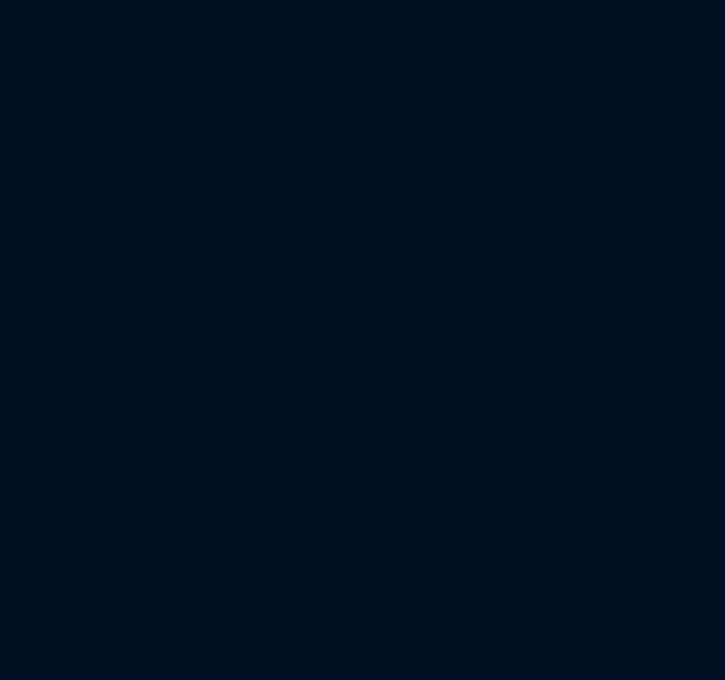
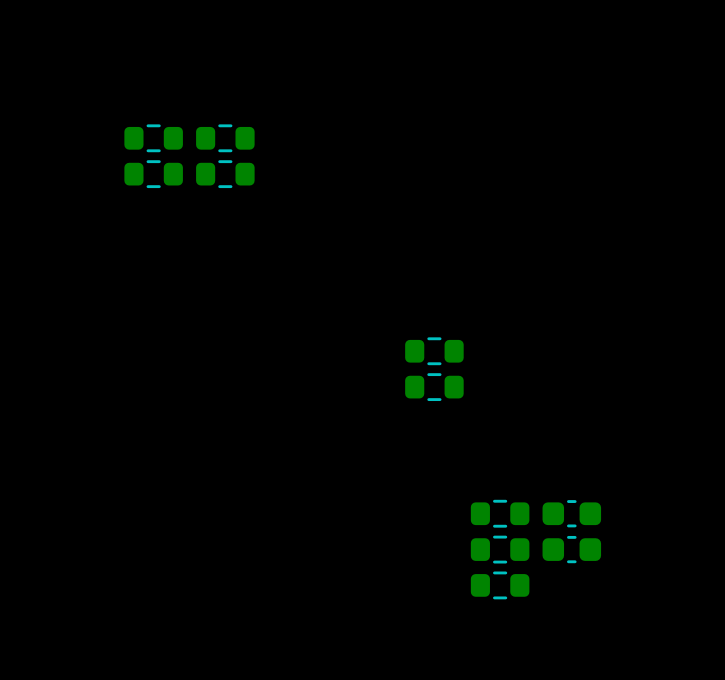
part: none -> (153, 138)
part: none -> (225, 138)
part: none -> (153, 174)
part: none -> (225, 174)
part: none -> (434, 351)
part: none -> (434, 387)
part: none -> (500, 513)
part: none -> (571, 513)
part: none -> (500, 549)
part: none -> (571, 549)
part: none -> (500, 585)

